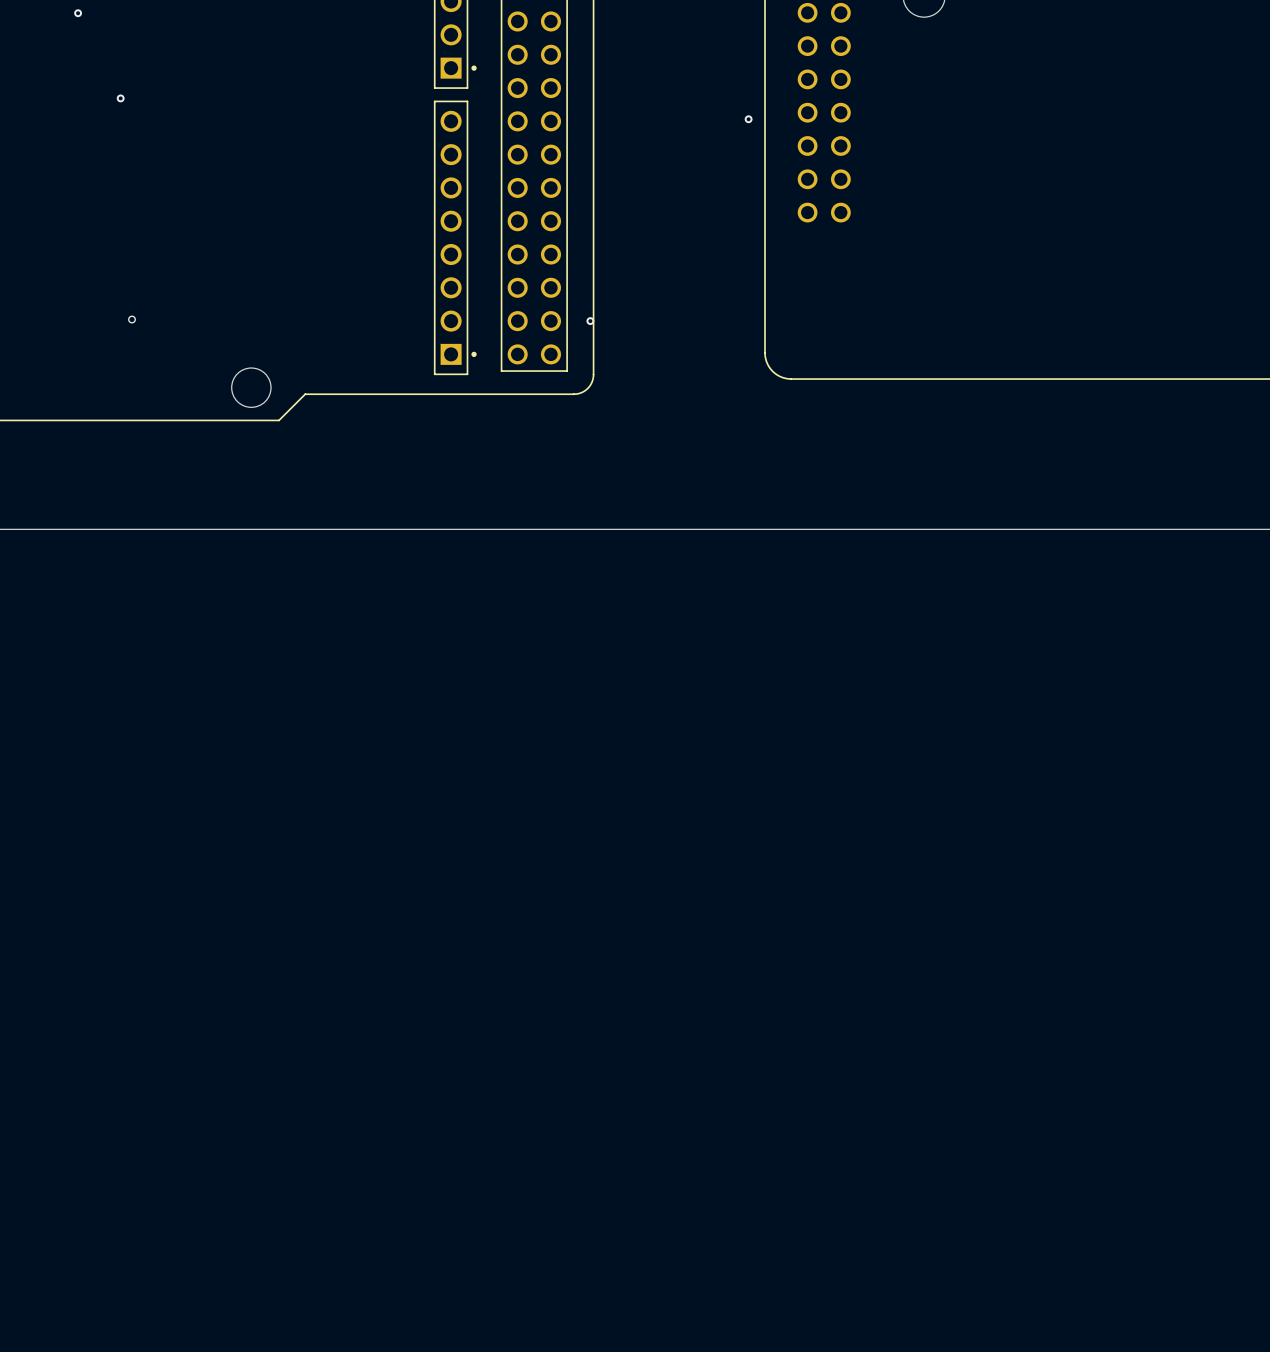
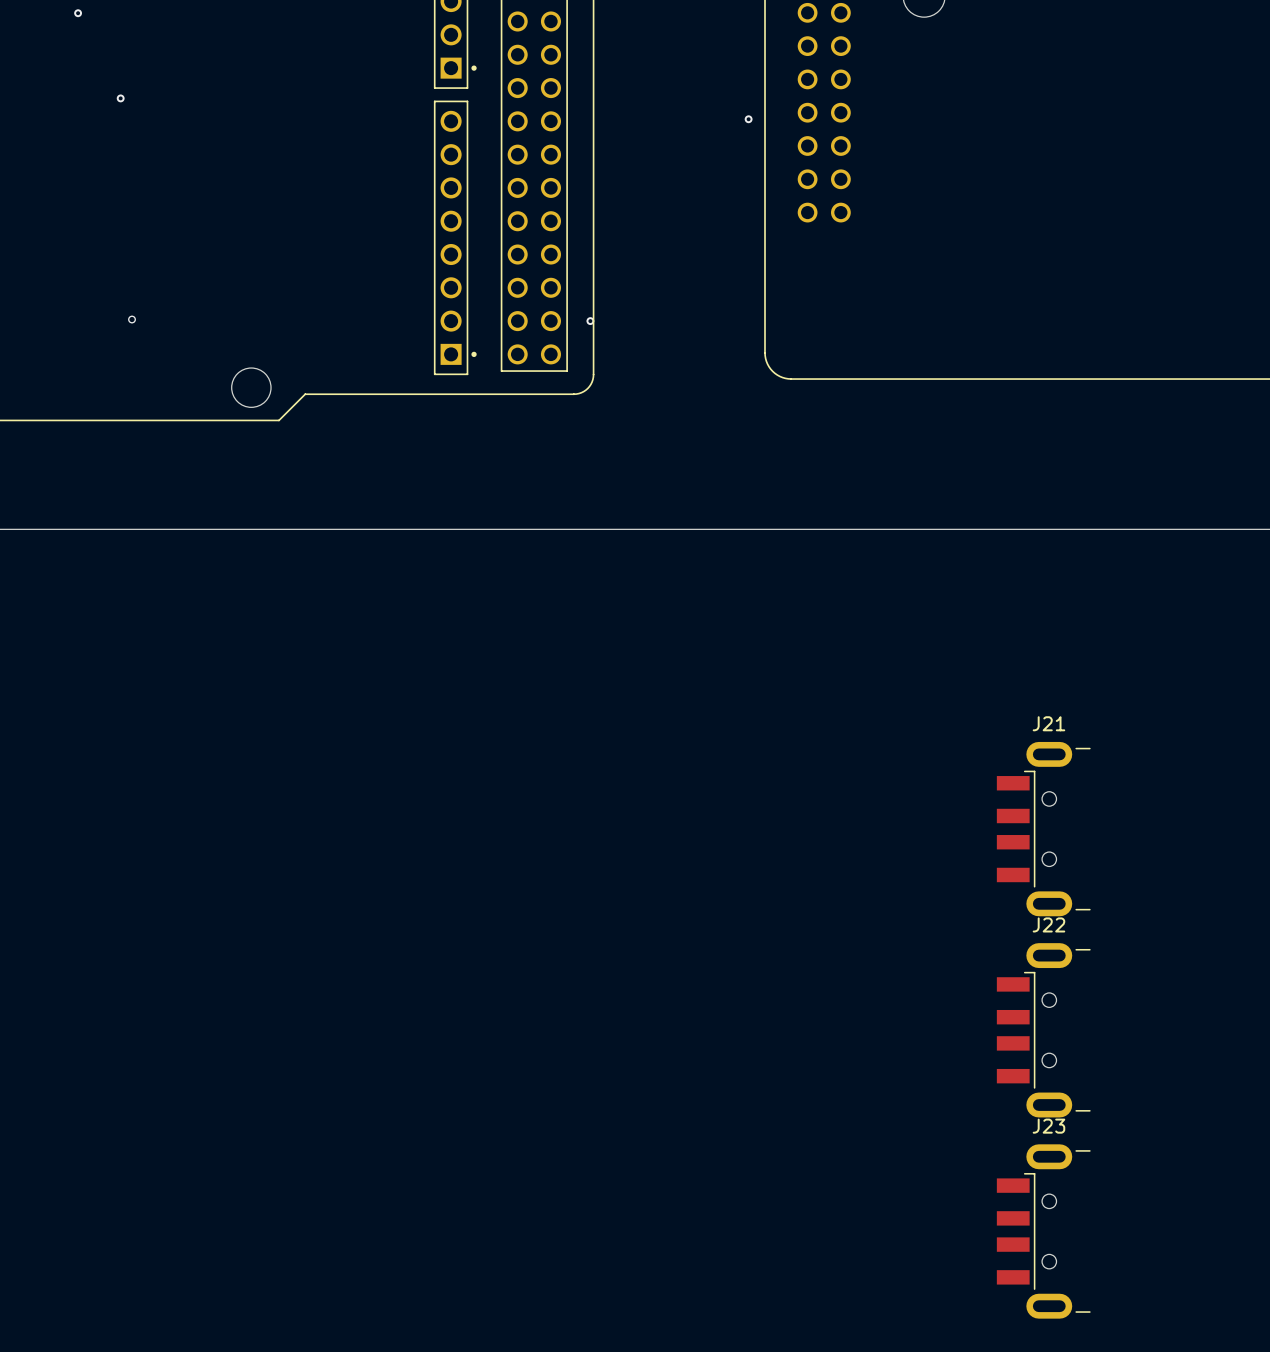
J21: none -> (1043, 829)
J22: none -> (1043, 1030)
J23: none -> (1043, 1231)

